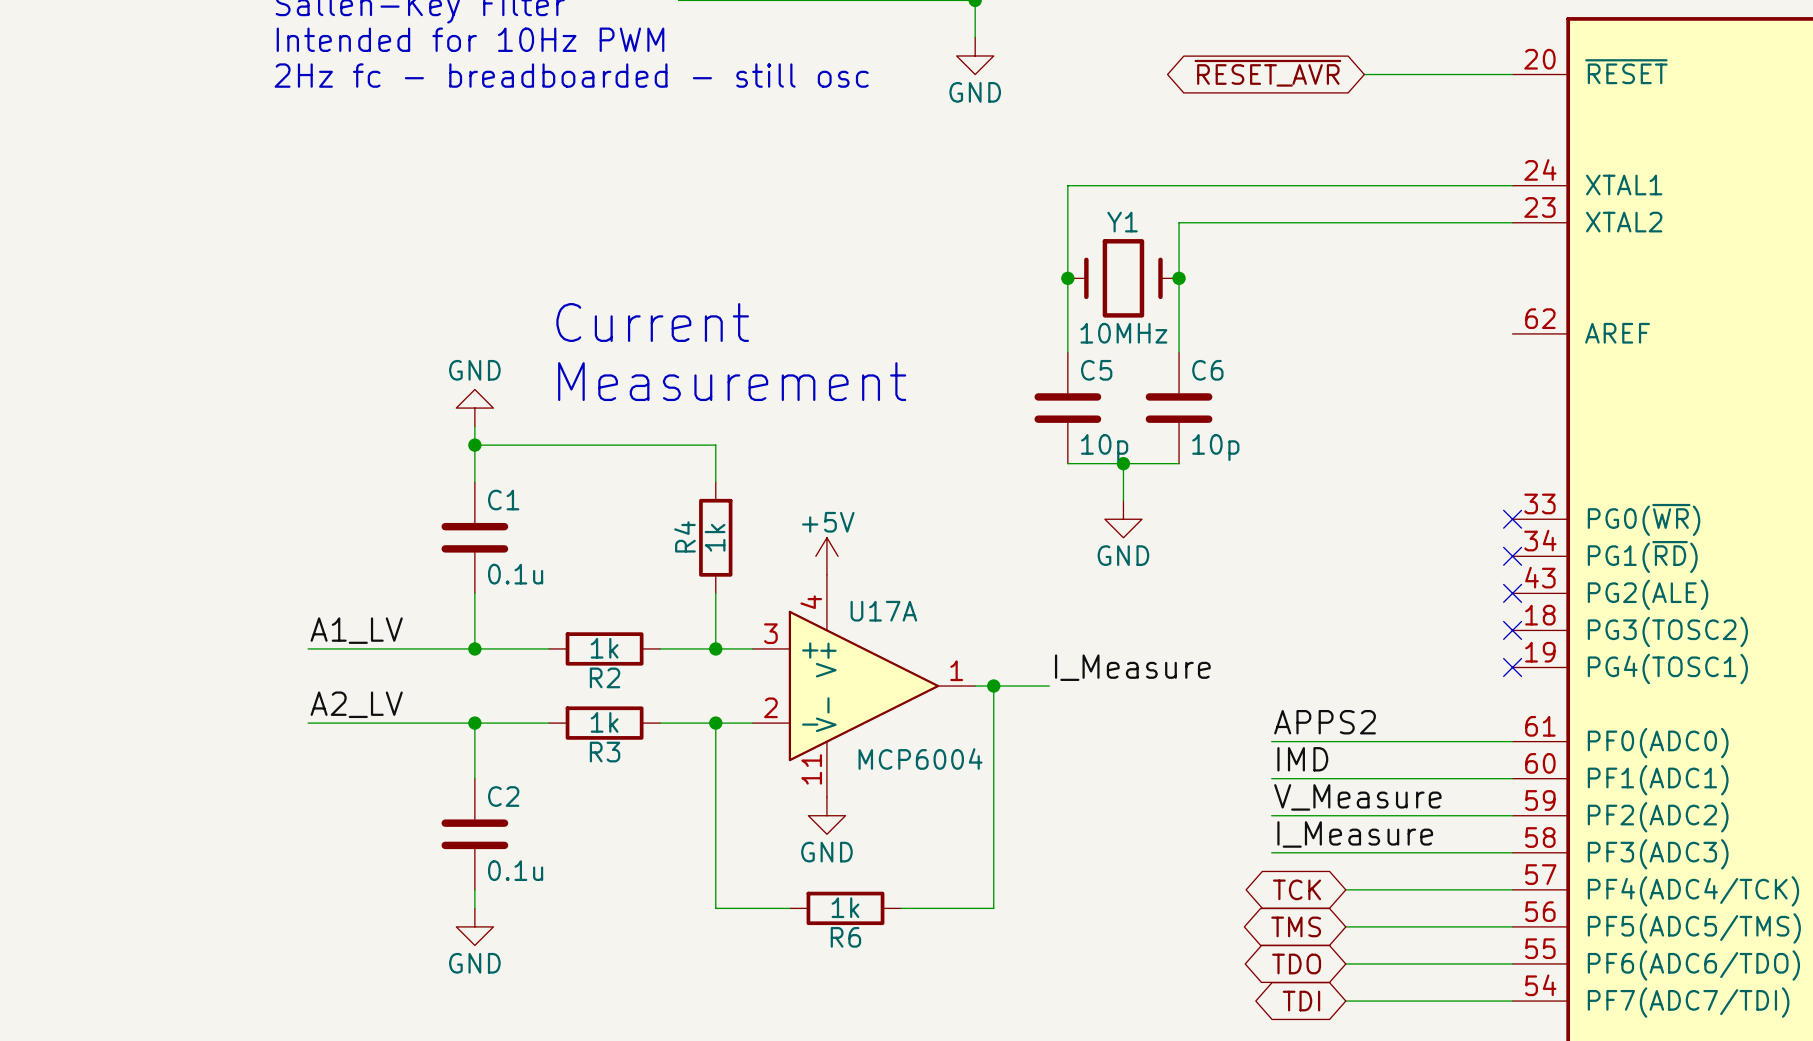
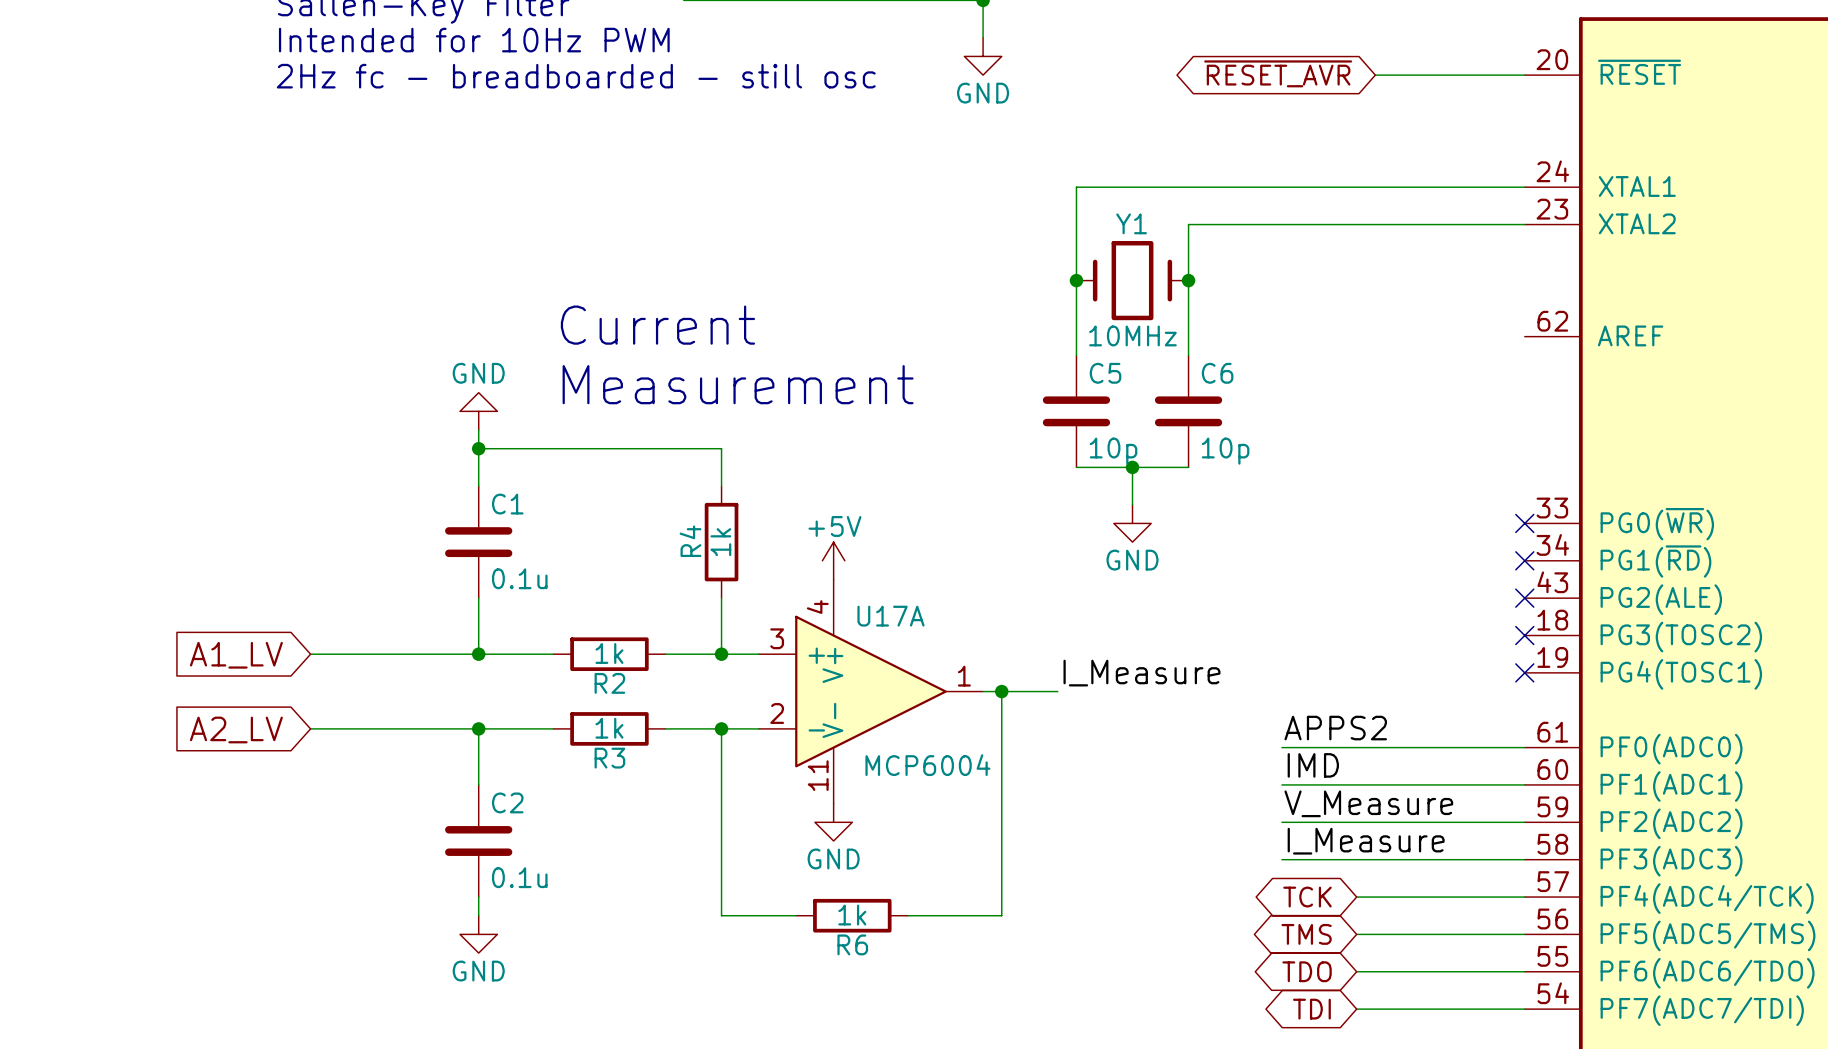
label: A1_LV (356, 630) -> none
global label: none -> A1_LV (236, 655)
label: A2_LV (356, 704) -> none
global label: none -> A2_LV (236, 729)

